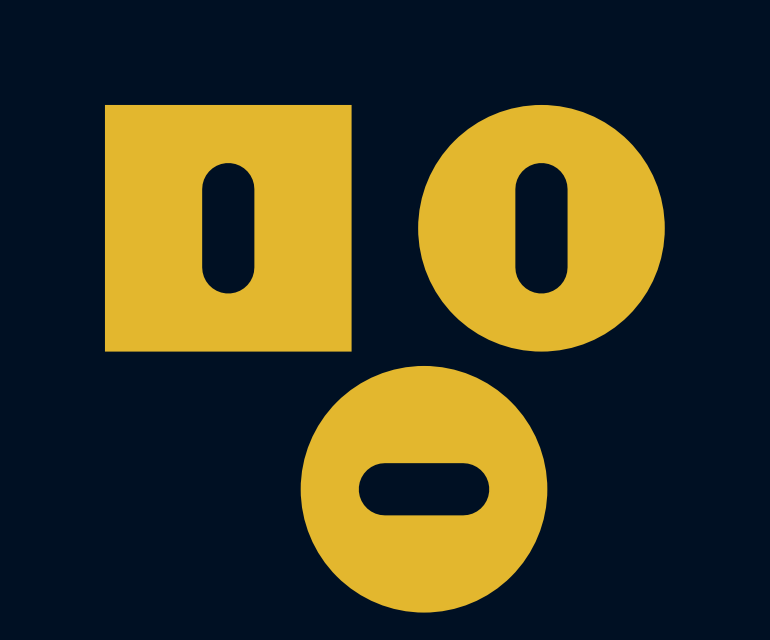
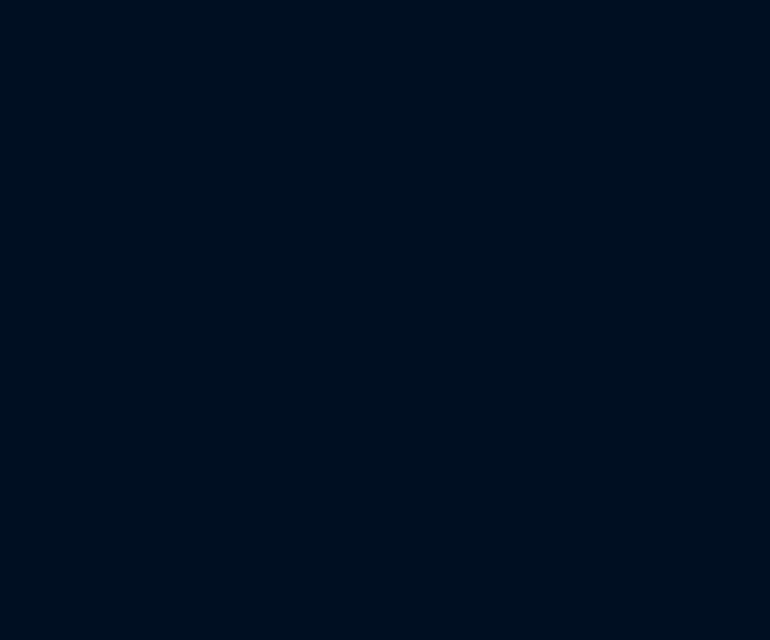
part: (384, 358) -> none

